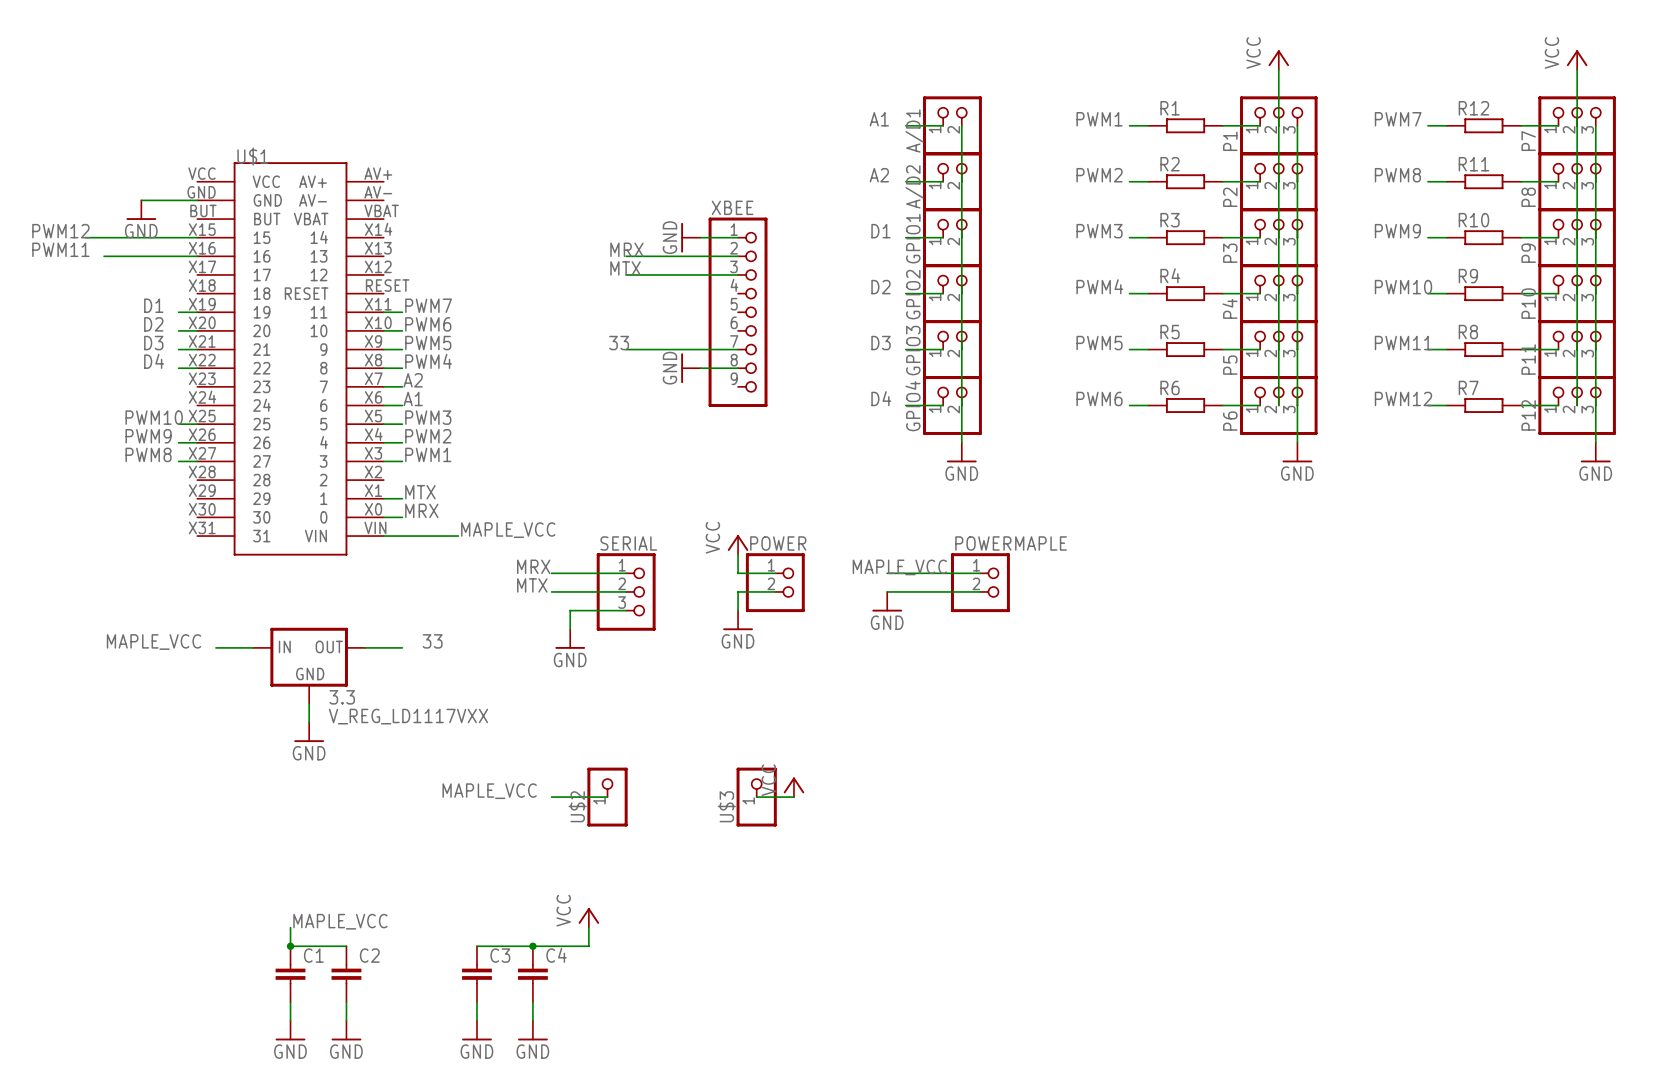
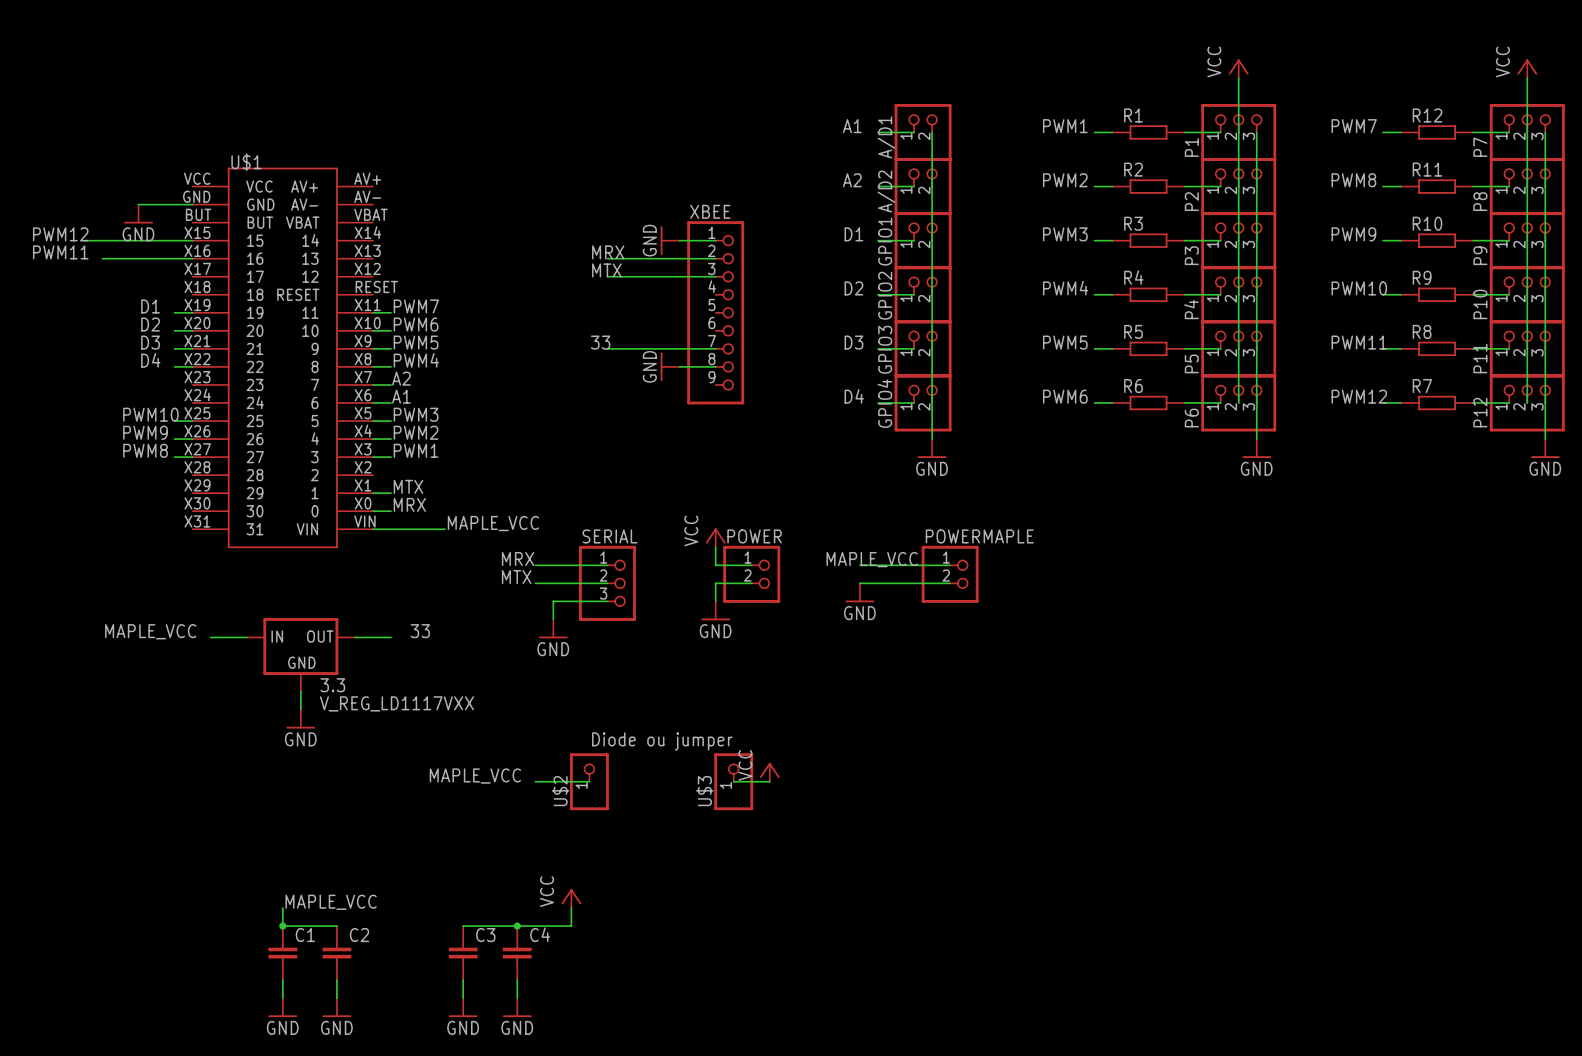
text: none -> Diode ou jumper (662, 741)

